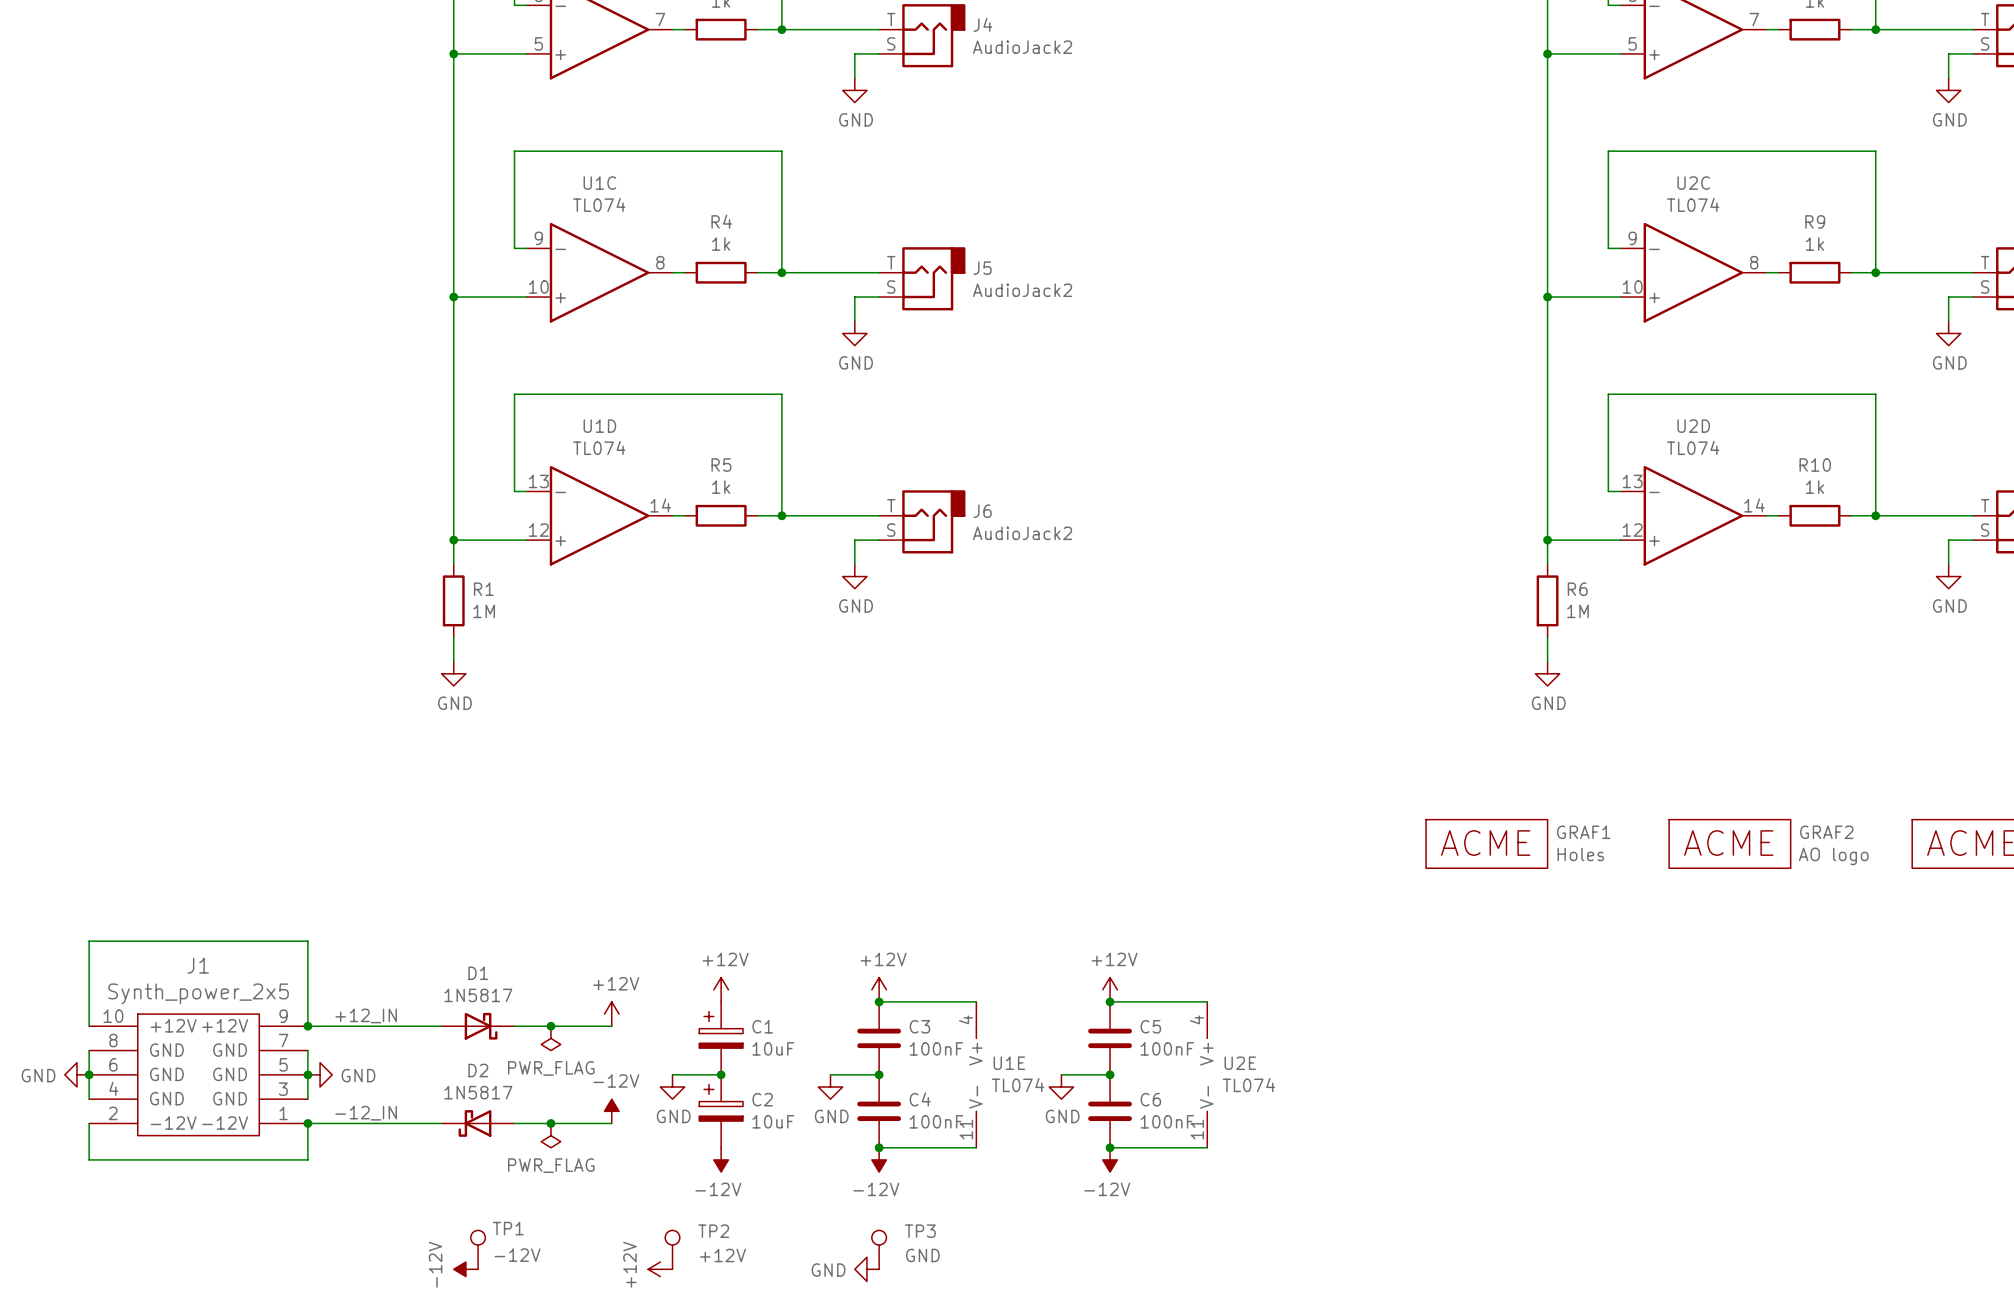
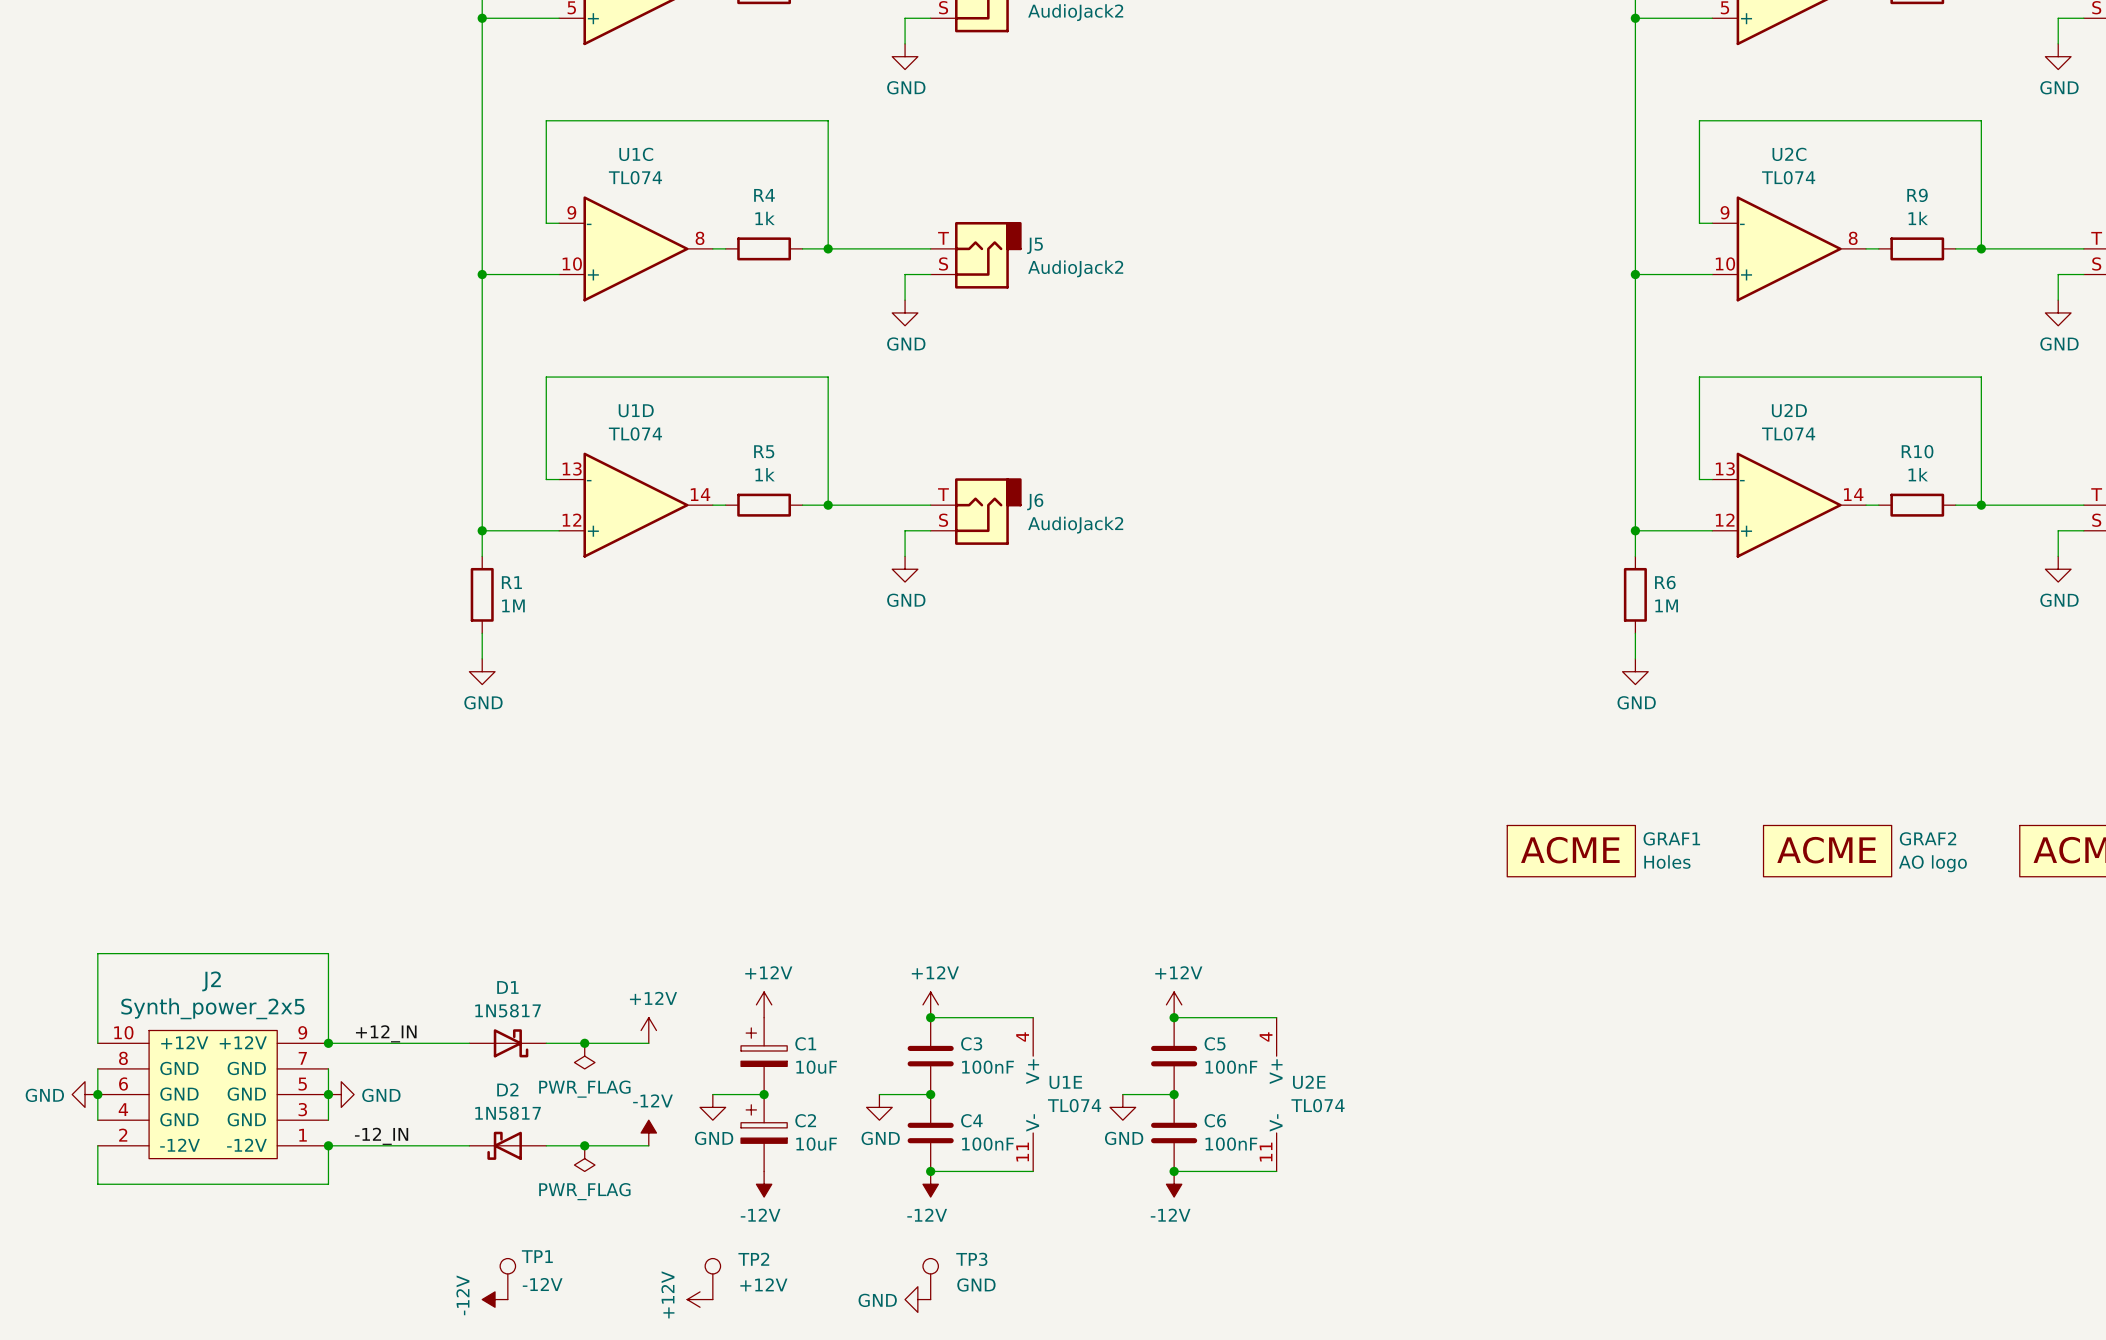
J1 name: J1 (198, 965) -> J2 (211, 981)

